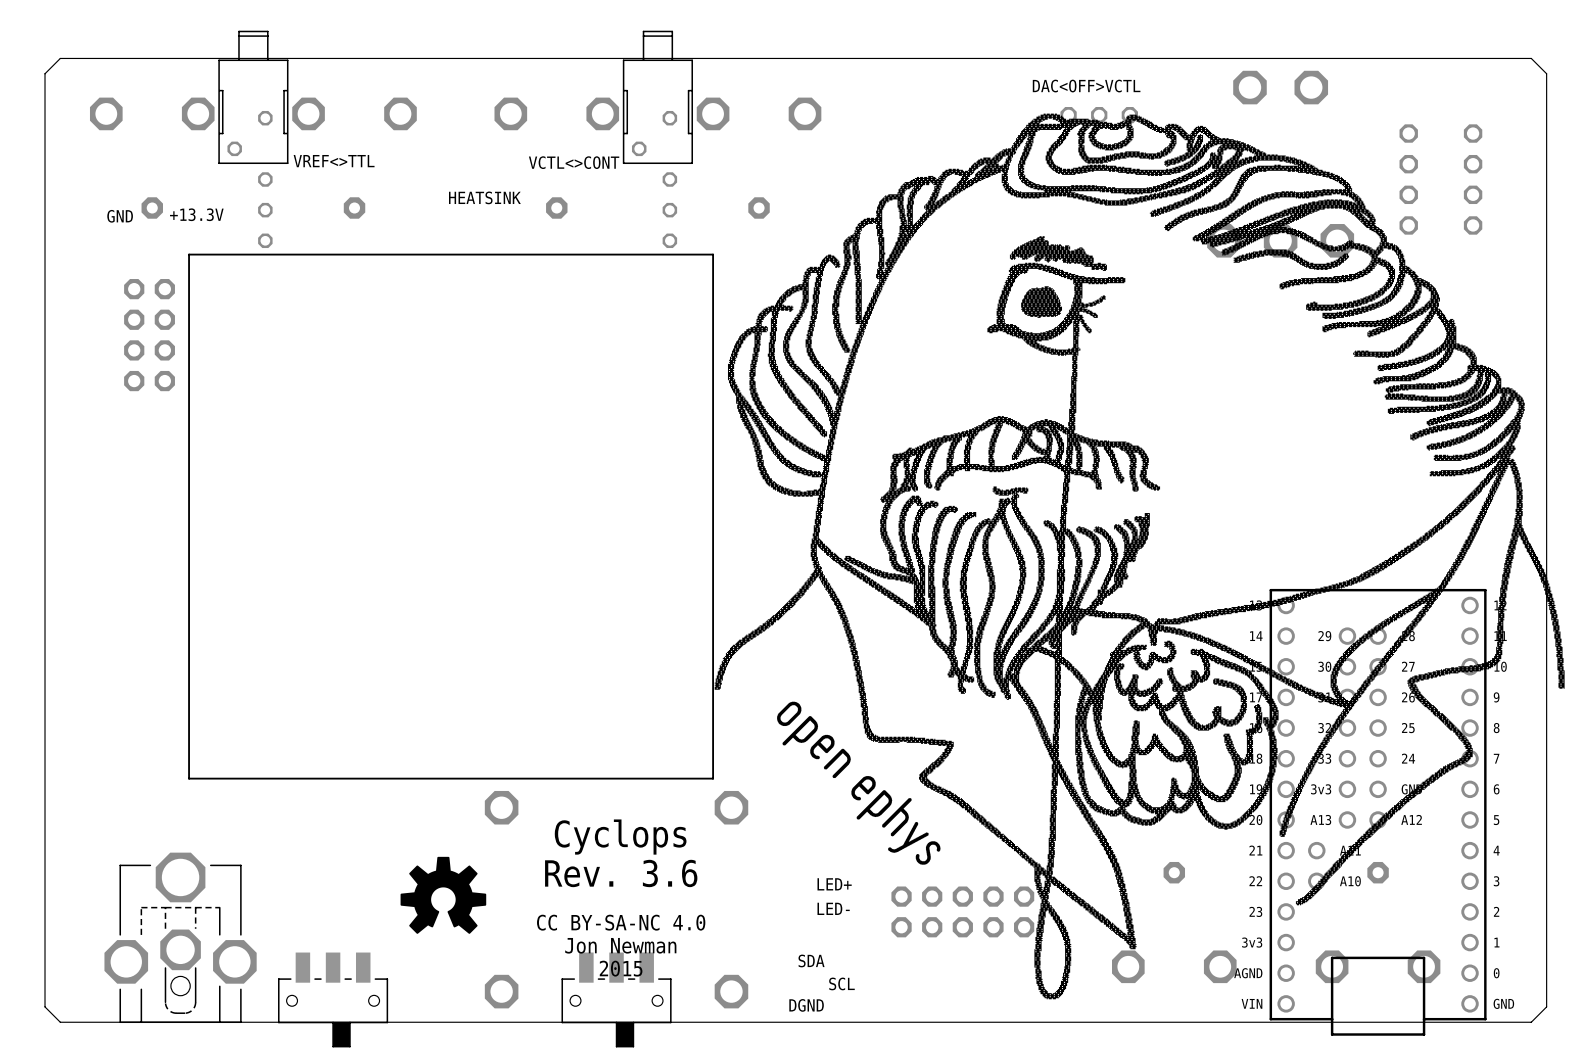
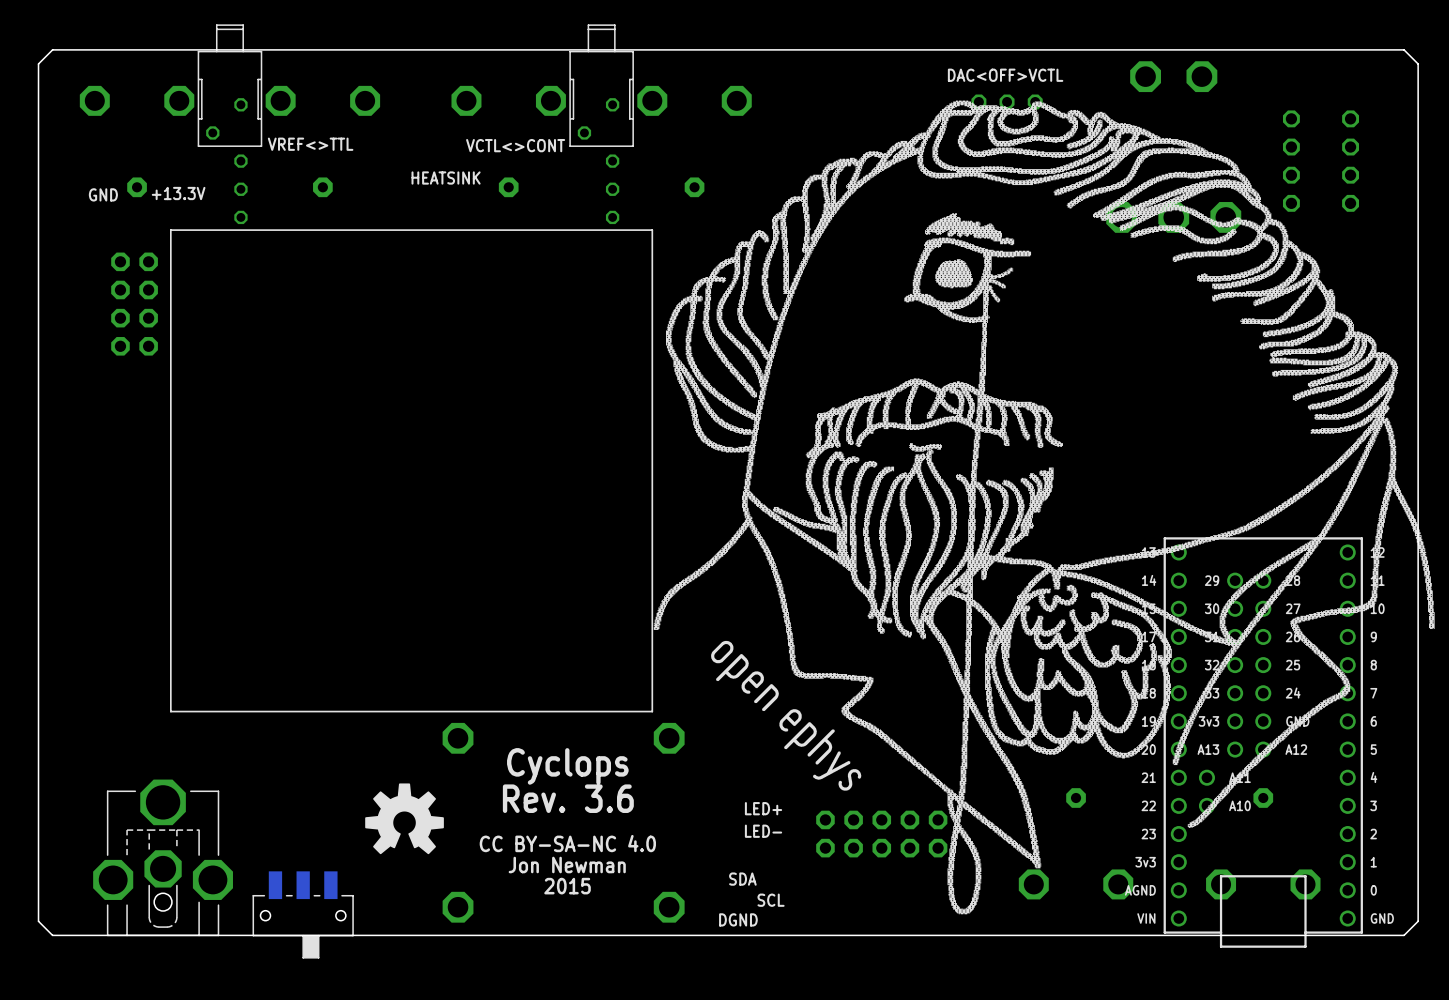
part: (616, 999) -> none

